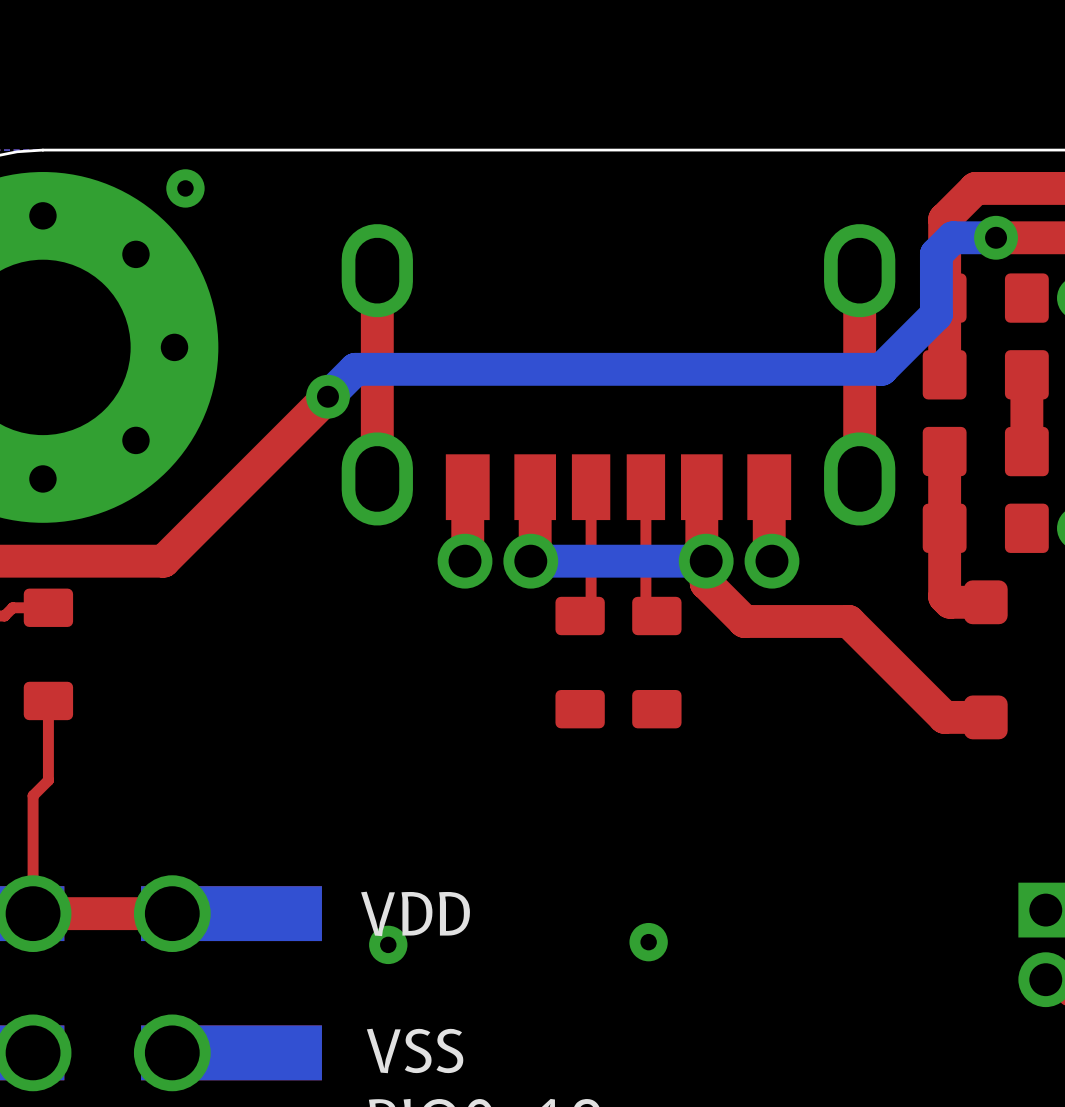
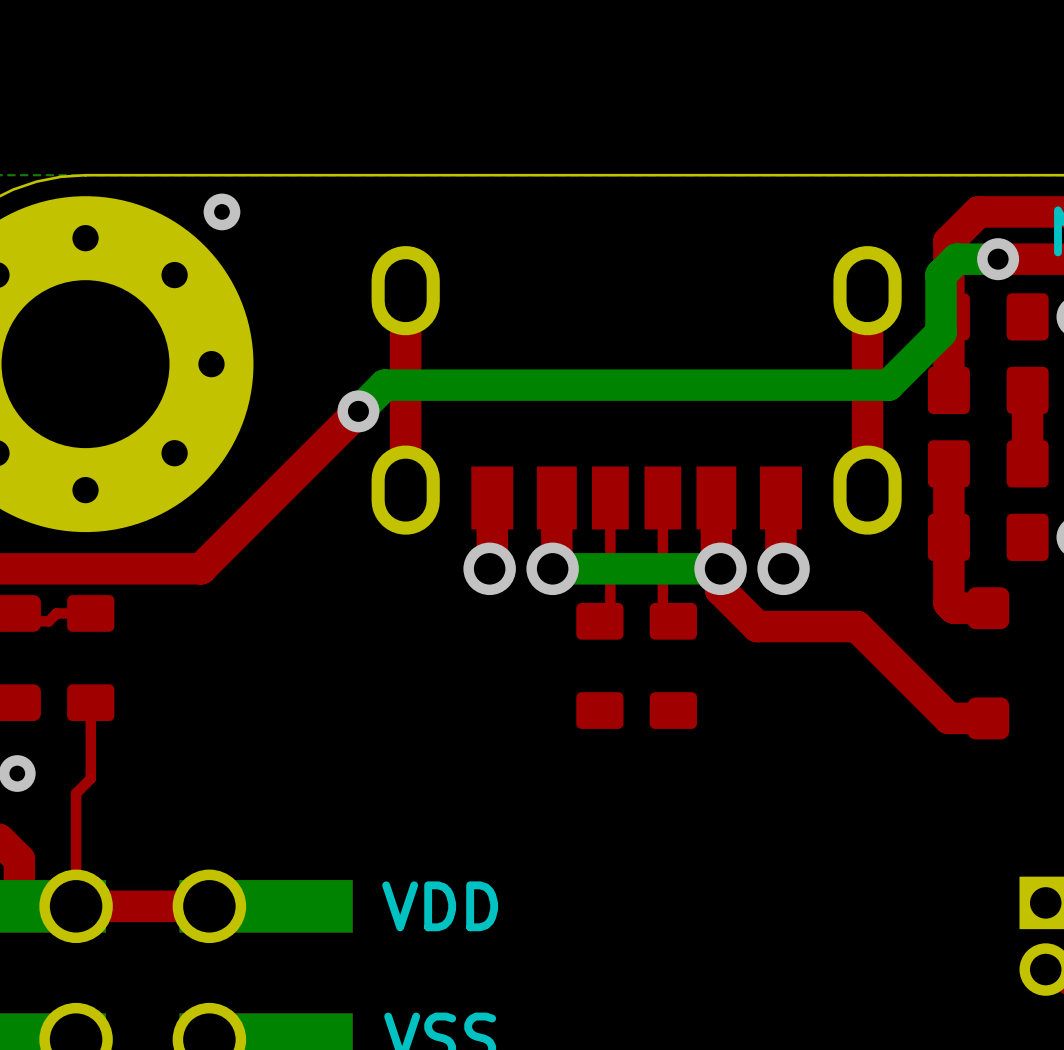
via: (648, 942) -> none
via: (388, 944) -> none

